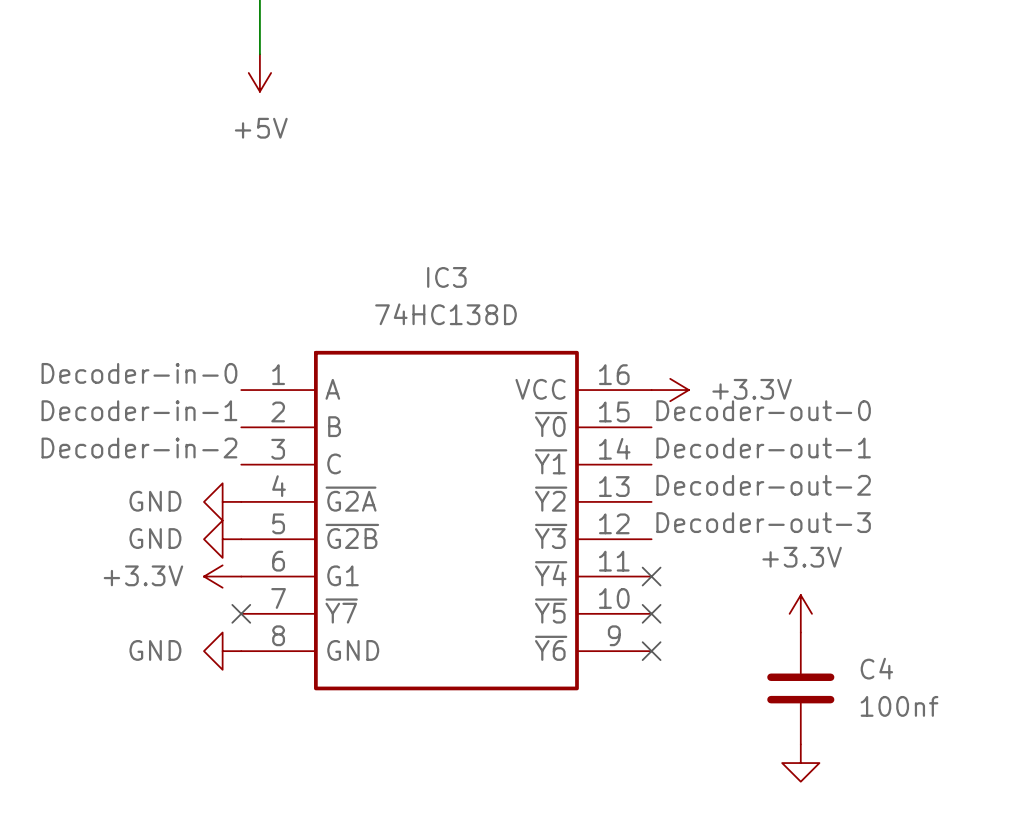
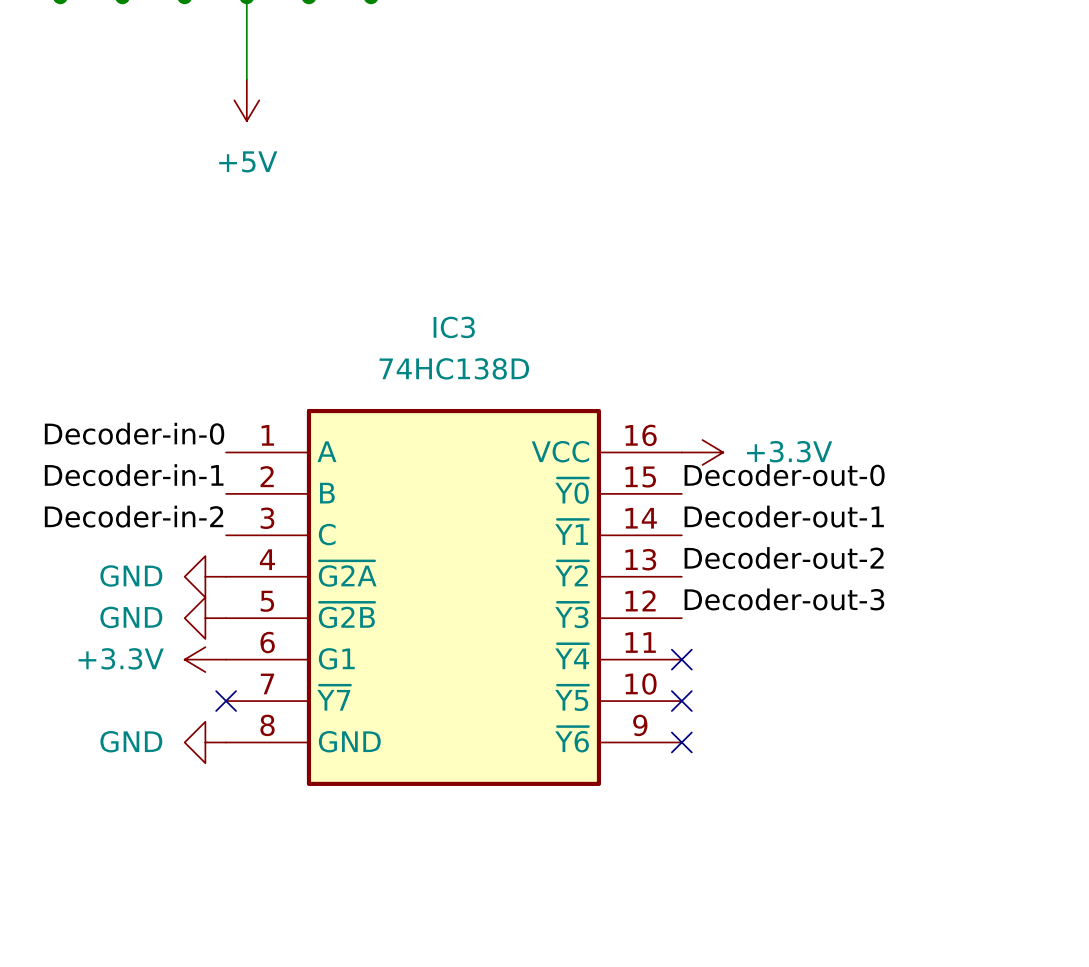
power symbol: +3.3V (800, 613) -> none
C4: 100nf (800, 688) -> none
power symbol: (800, 763) -> none

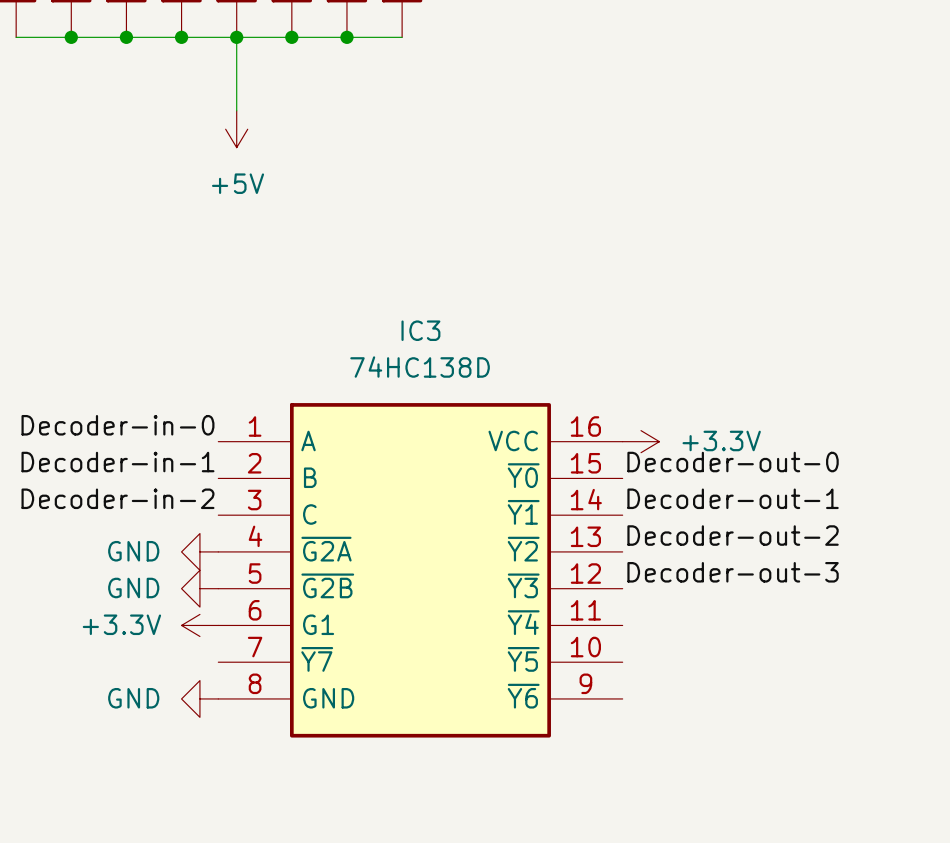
no-connect mark: (681, 659) -> none
no-connect mark: (226, 701) -> none
no-connect mark: (681, 701) -> none
no-connect mark: (681, 742) -> none

